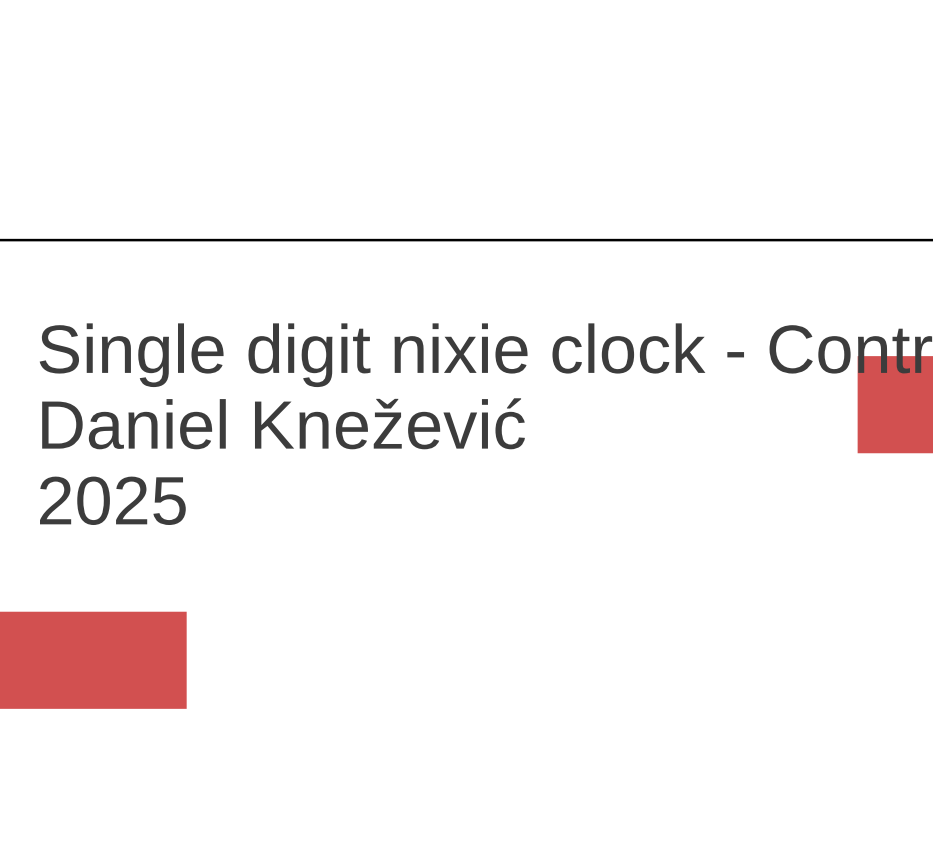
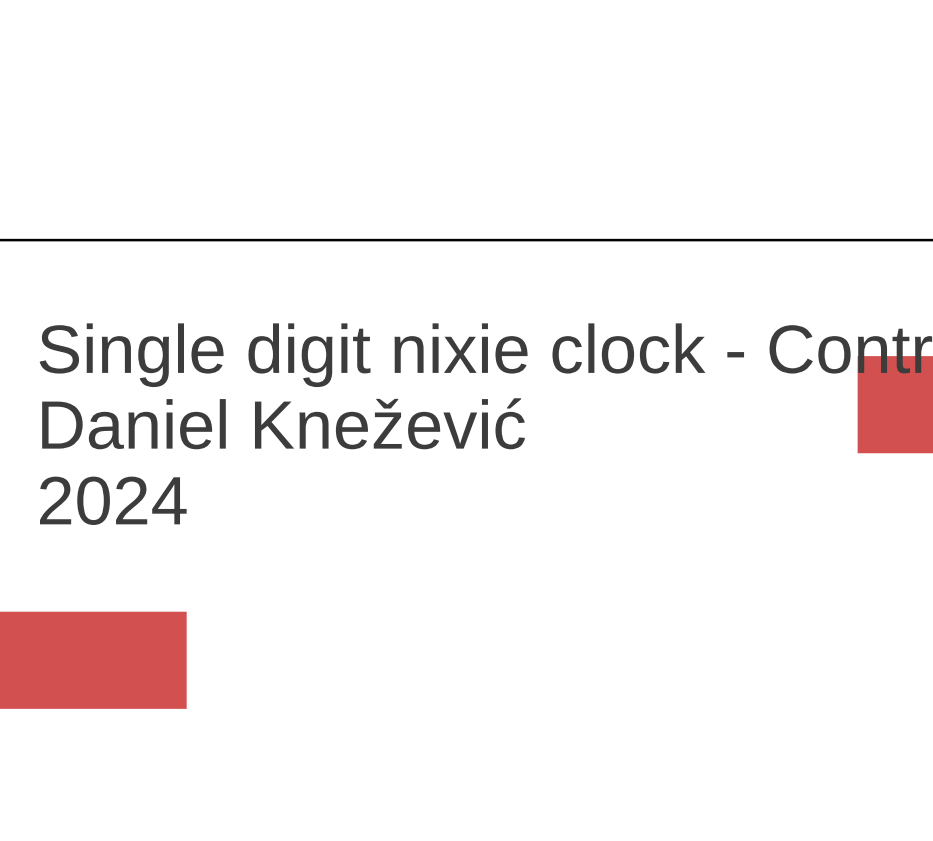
text: 2025 (112, 500) -> 2024 (113, 500)

